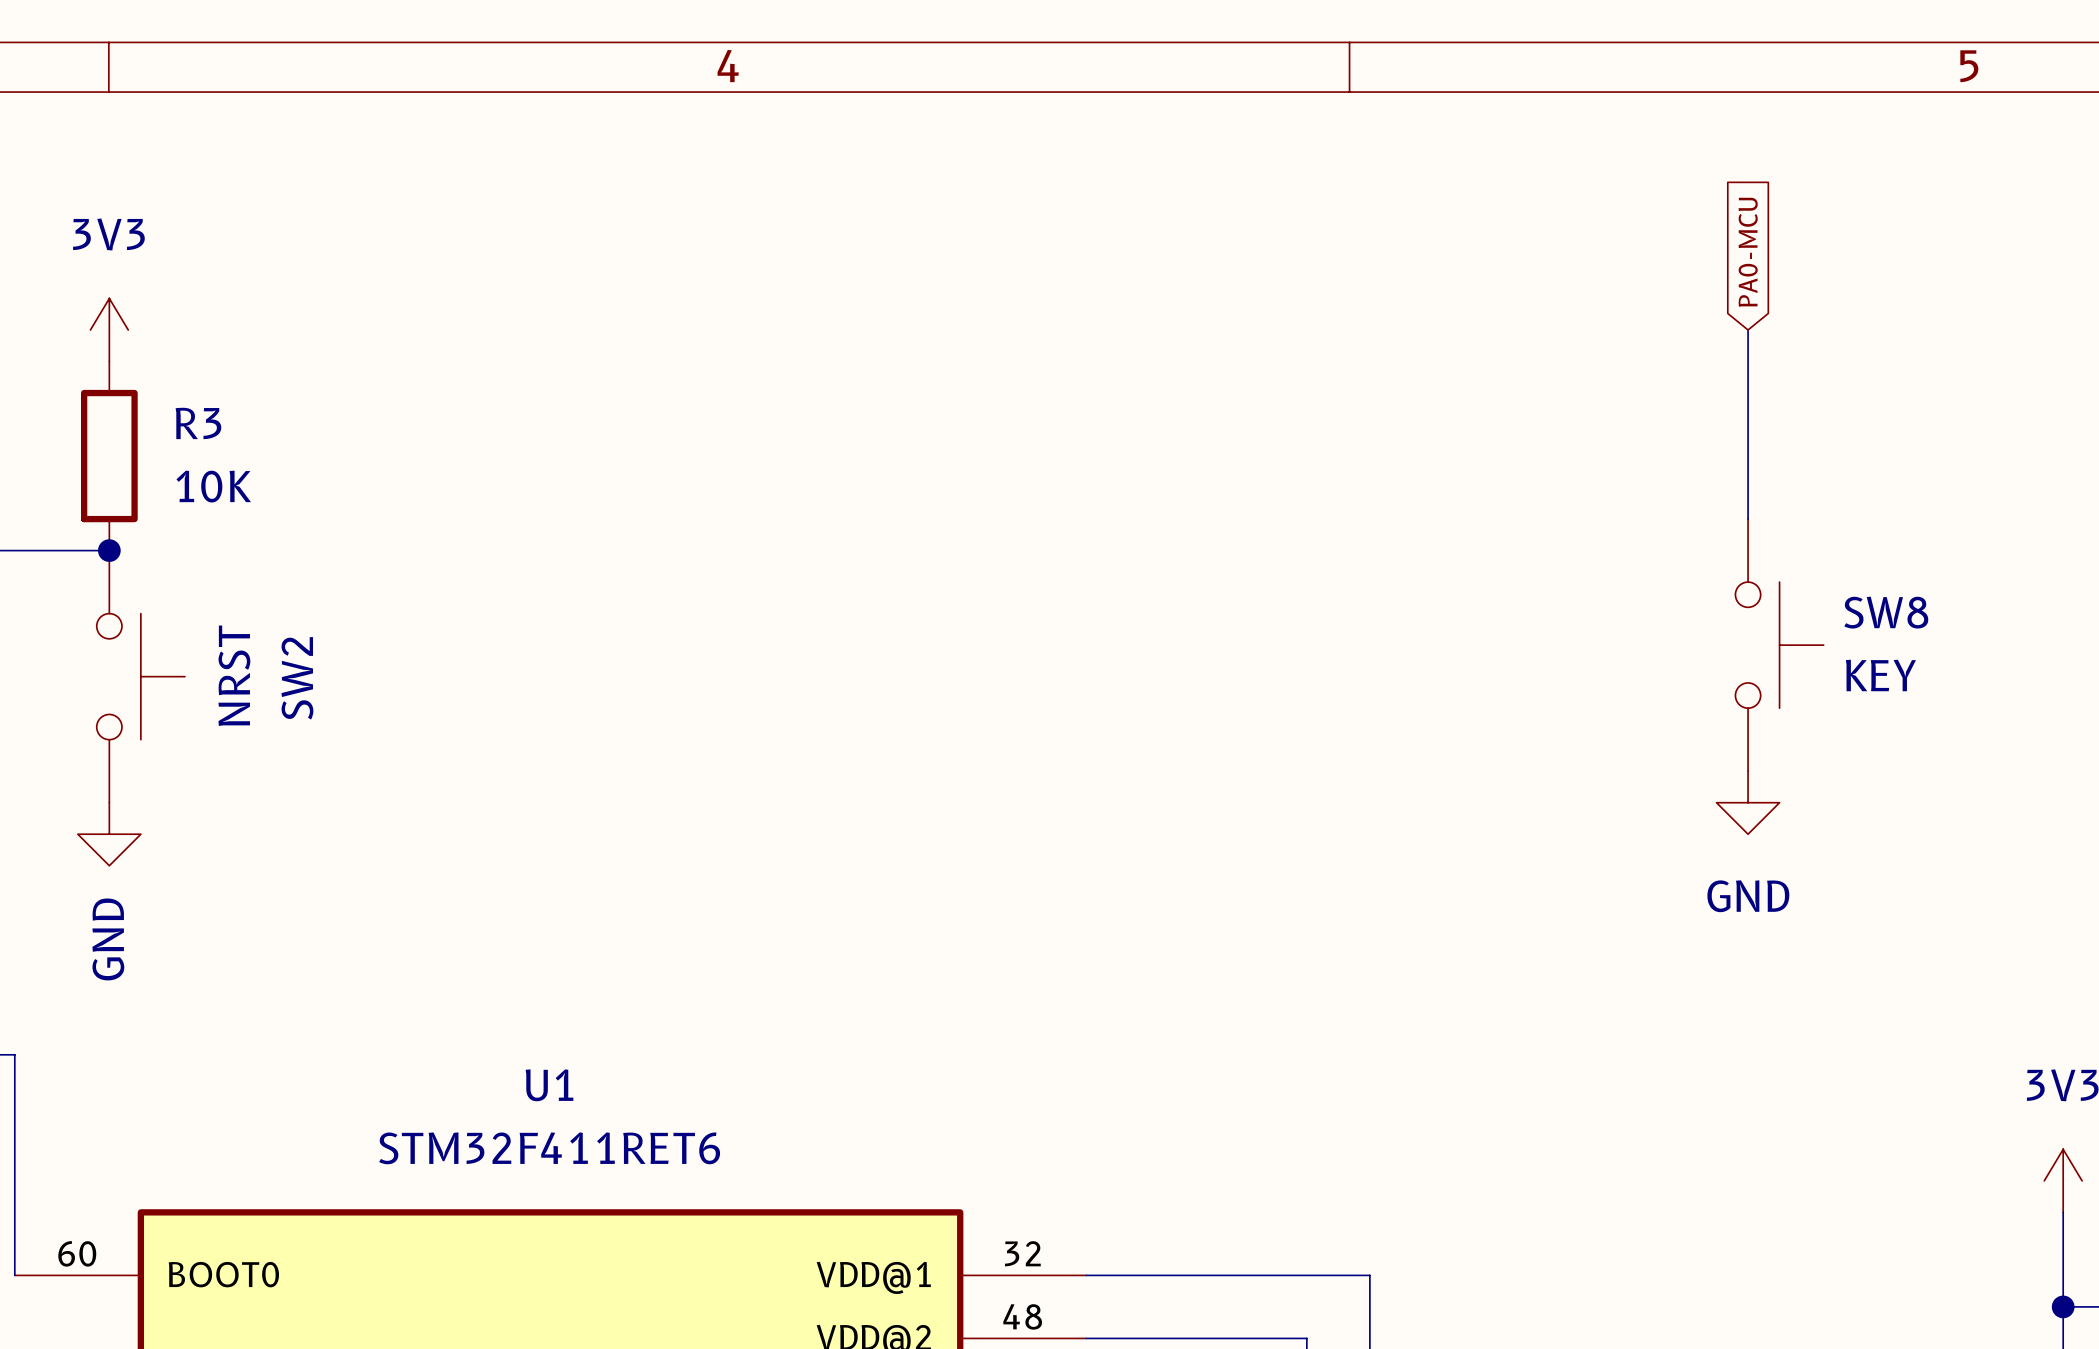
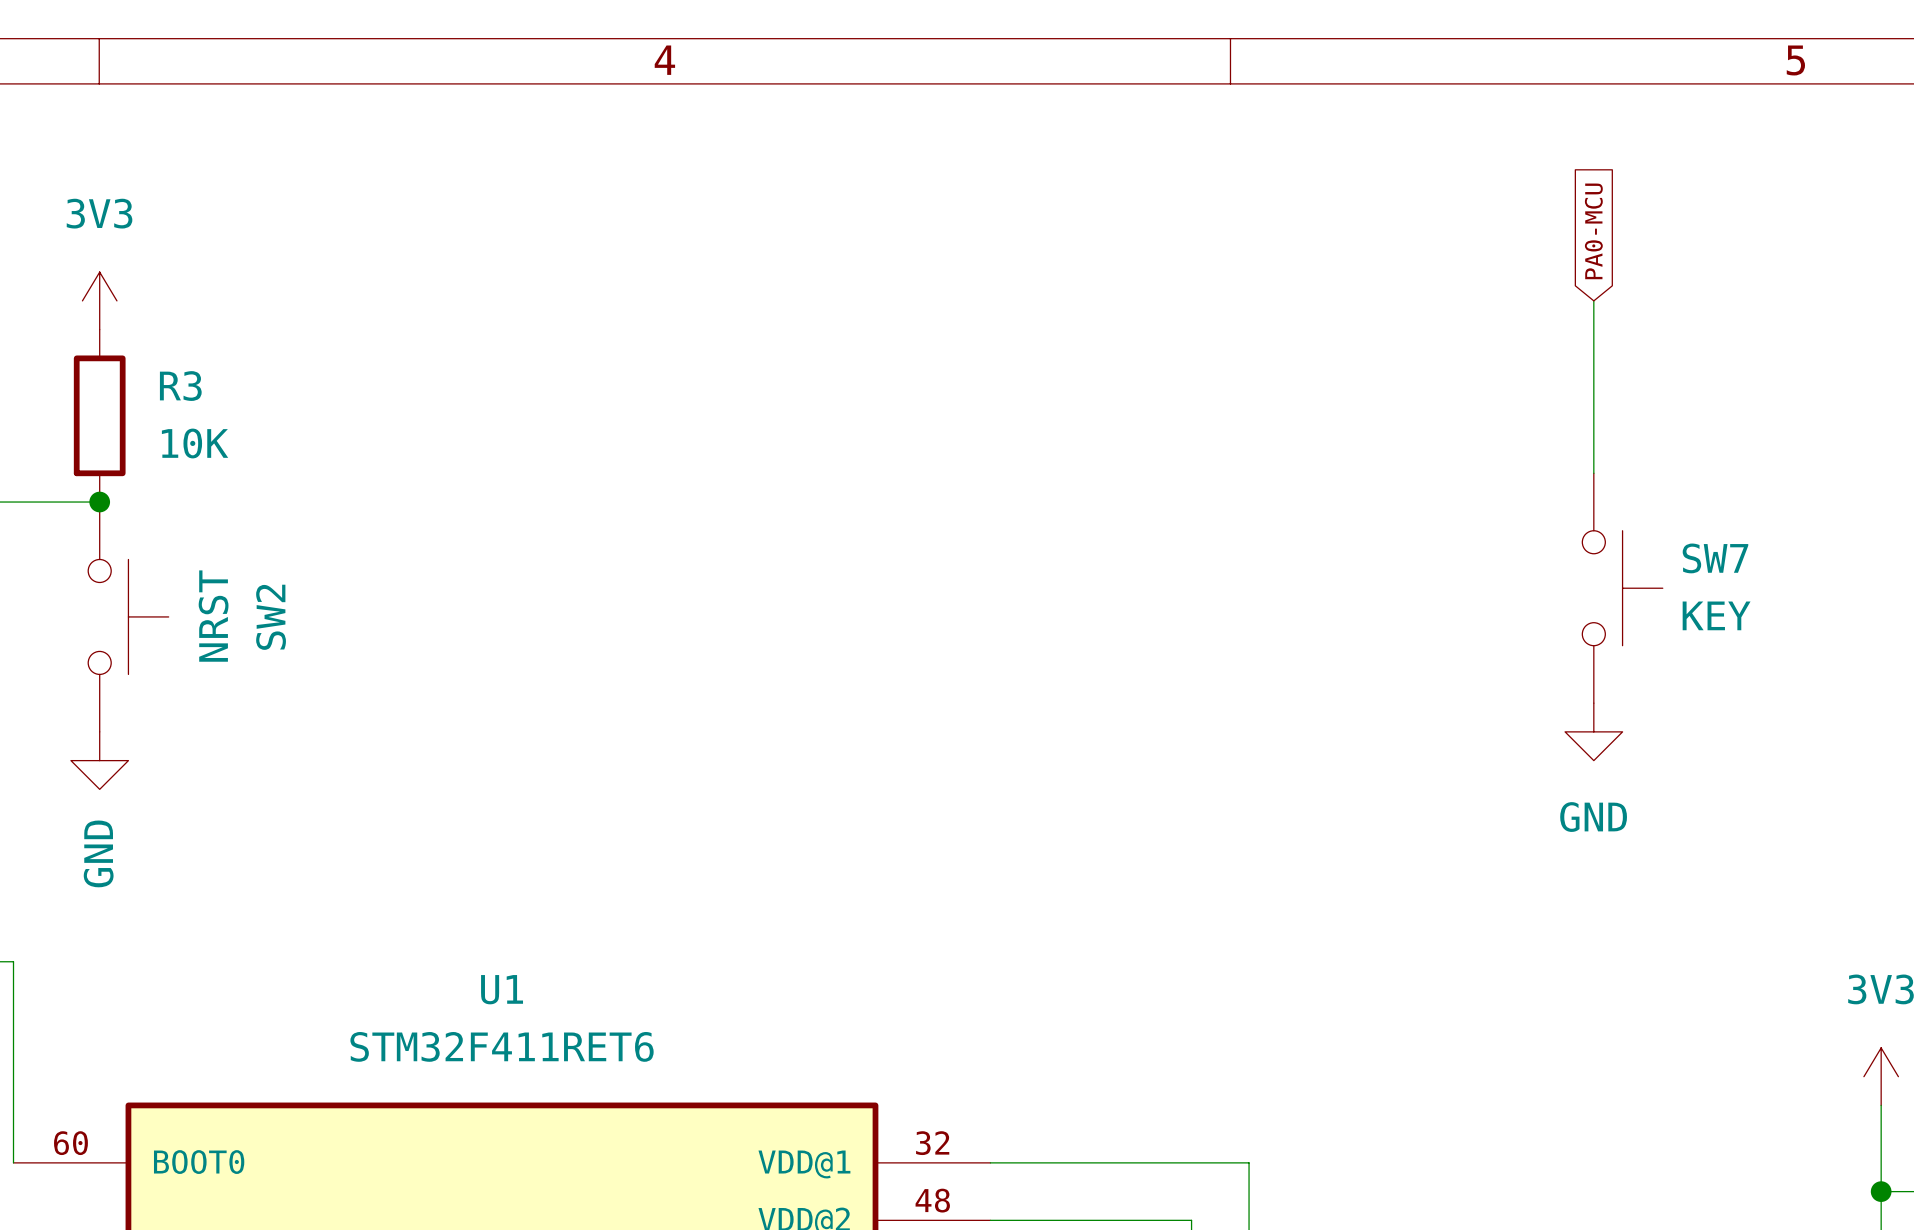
SW8 name: SW8 (1886, 612) -> SW7 (1715, 558)

